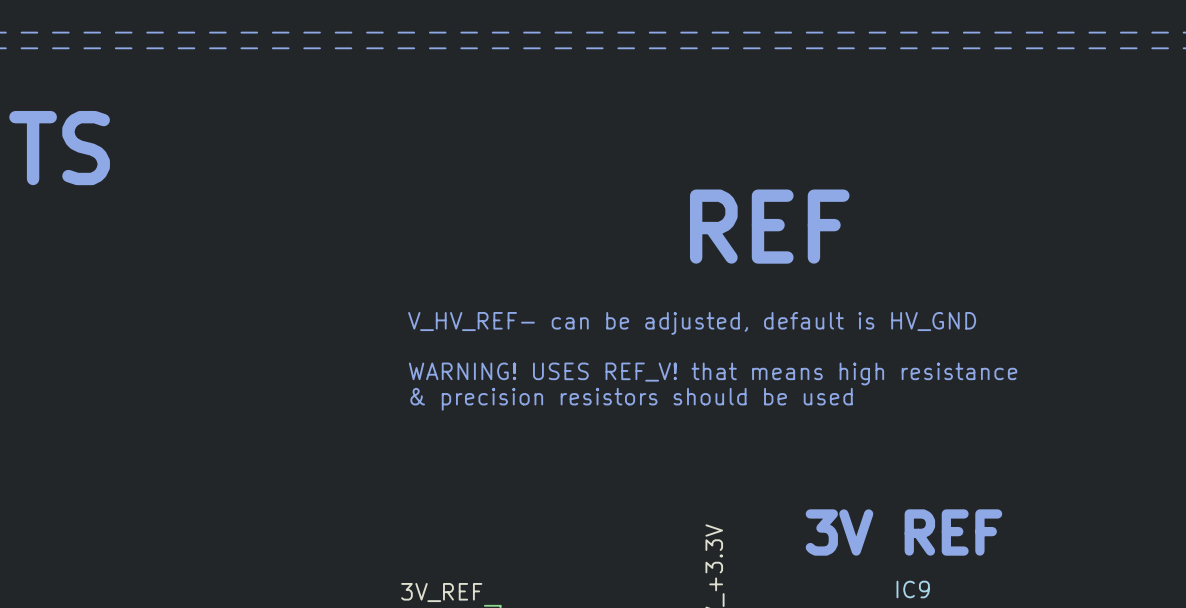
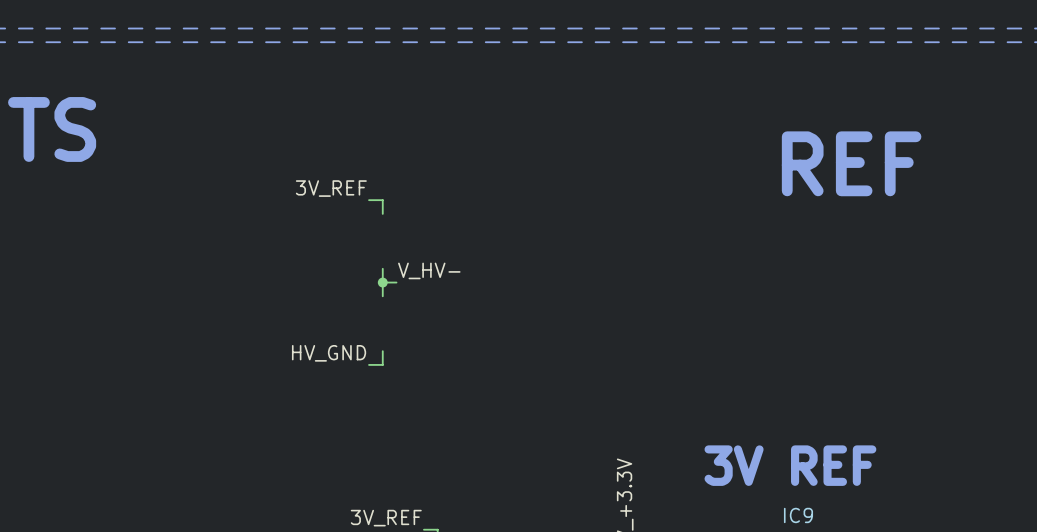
label: none -> 3V_REF (331, 188)
text position: REF (769, 226) -> REF (851, 163)
wire: none -> (369, 200) (382, 200) (382, 213)
wire: none -> (382, 268) (382, 296)
label: none -> V_HV- (429, 270)
wire: none -> (382, 282) (396, 282)
junction: none -> (382, 282)
text: V_HV_REF- can be adjusted, default is HV_GND (692, 323) -> none
text: WARNING! USES REF_V! that means high resistance (713, 373) -> none
text: & precision resistors should be used (631, 399) -> none
wire: none -> (382, 351) (382, 364) (369, 364)
label: none -> HV_GND (329, 353)

